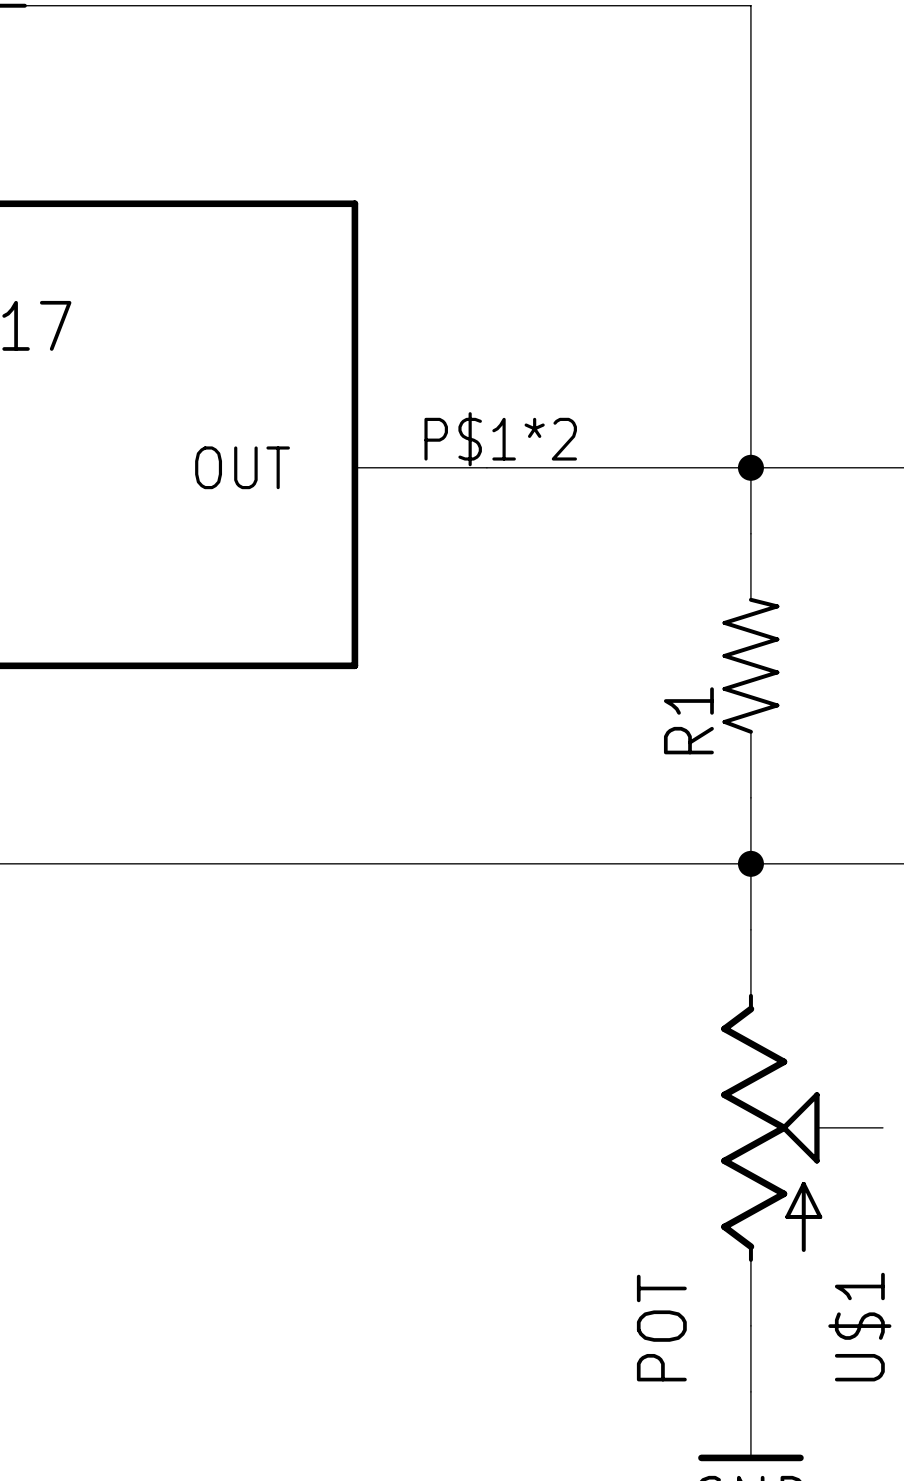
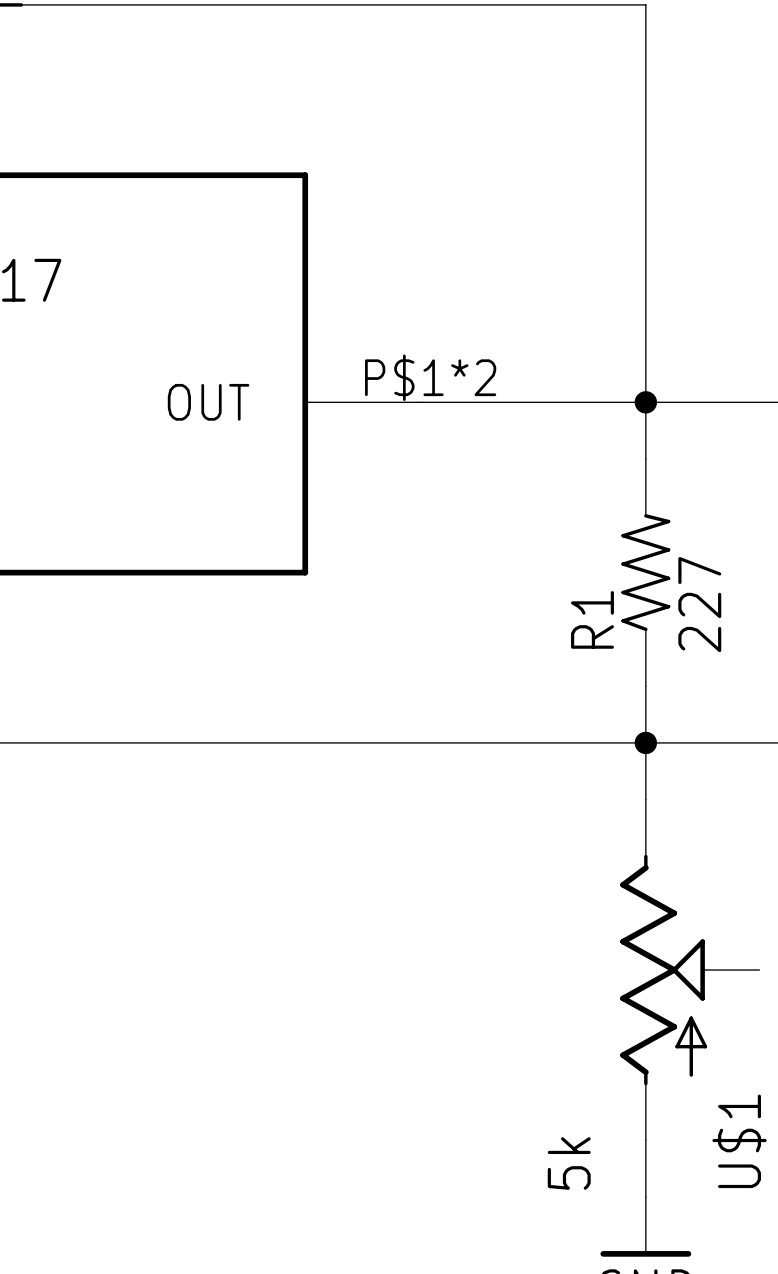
R1 value: none -> 227 (699, 604)
U$1 value: POT (661, 1328) -> 5k (569, 1163)

